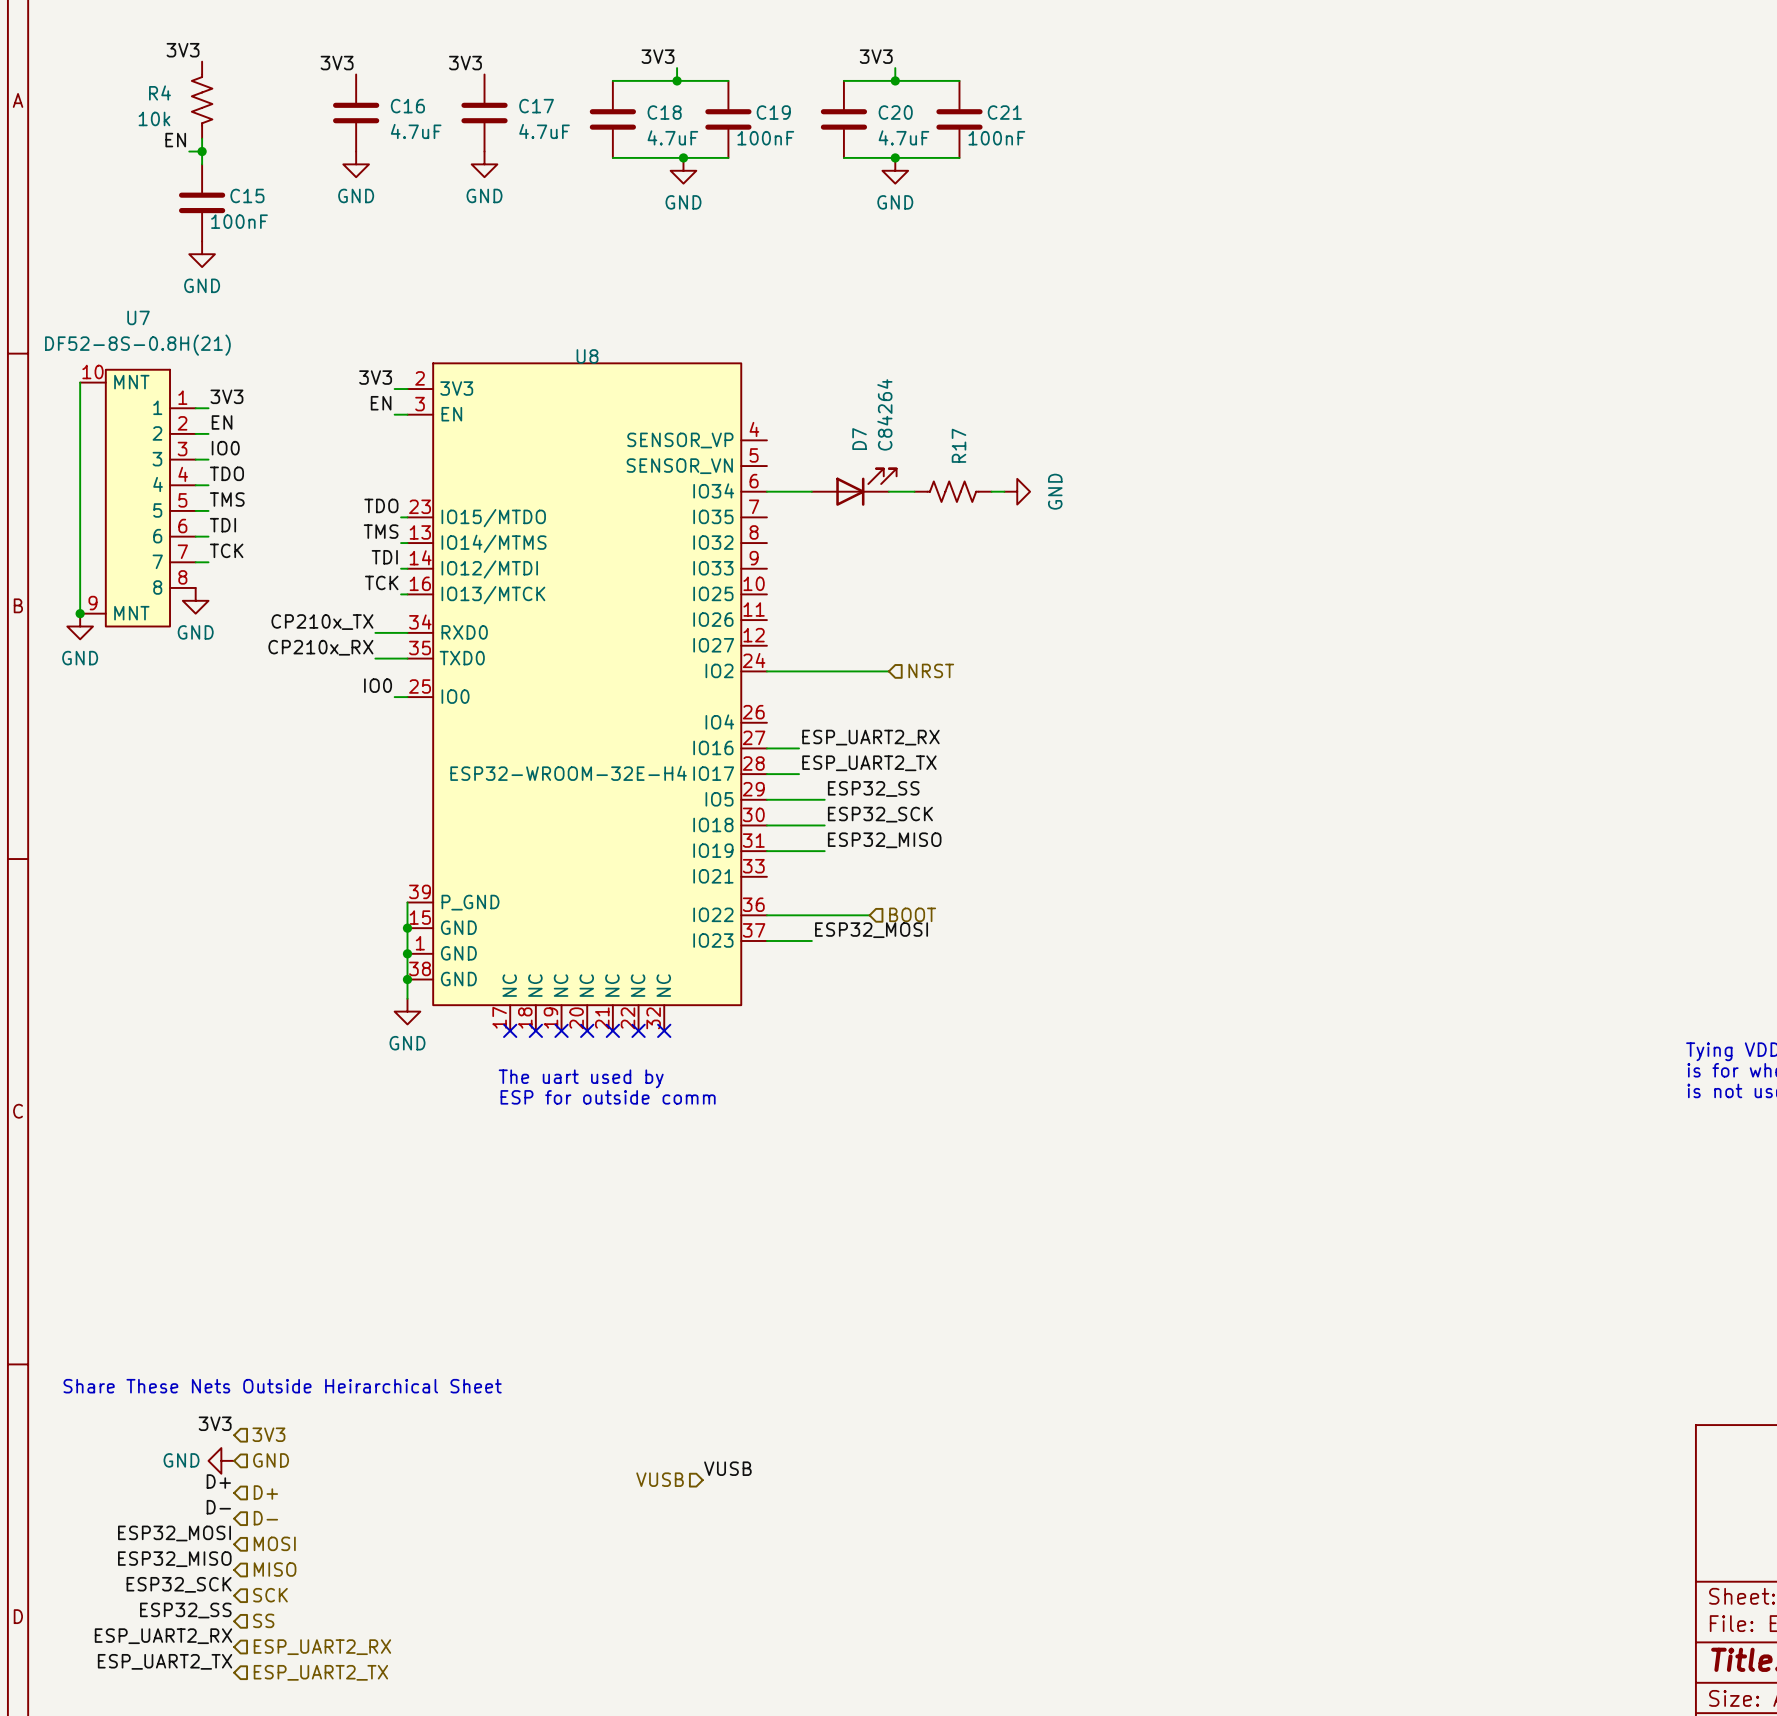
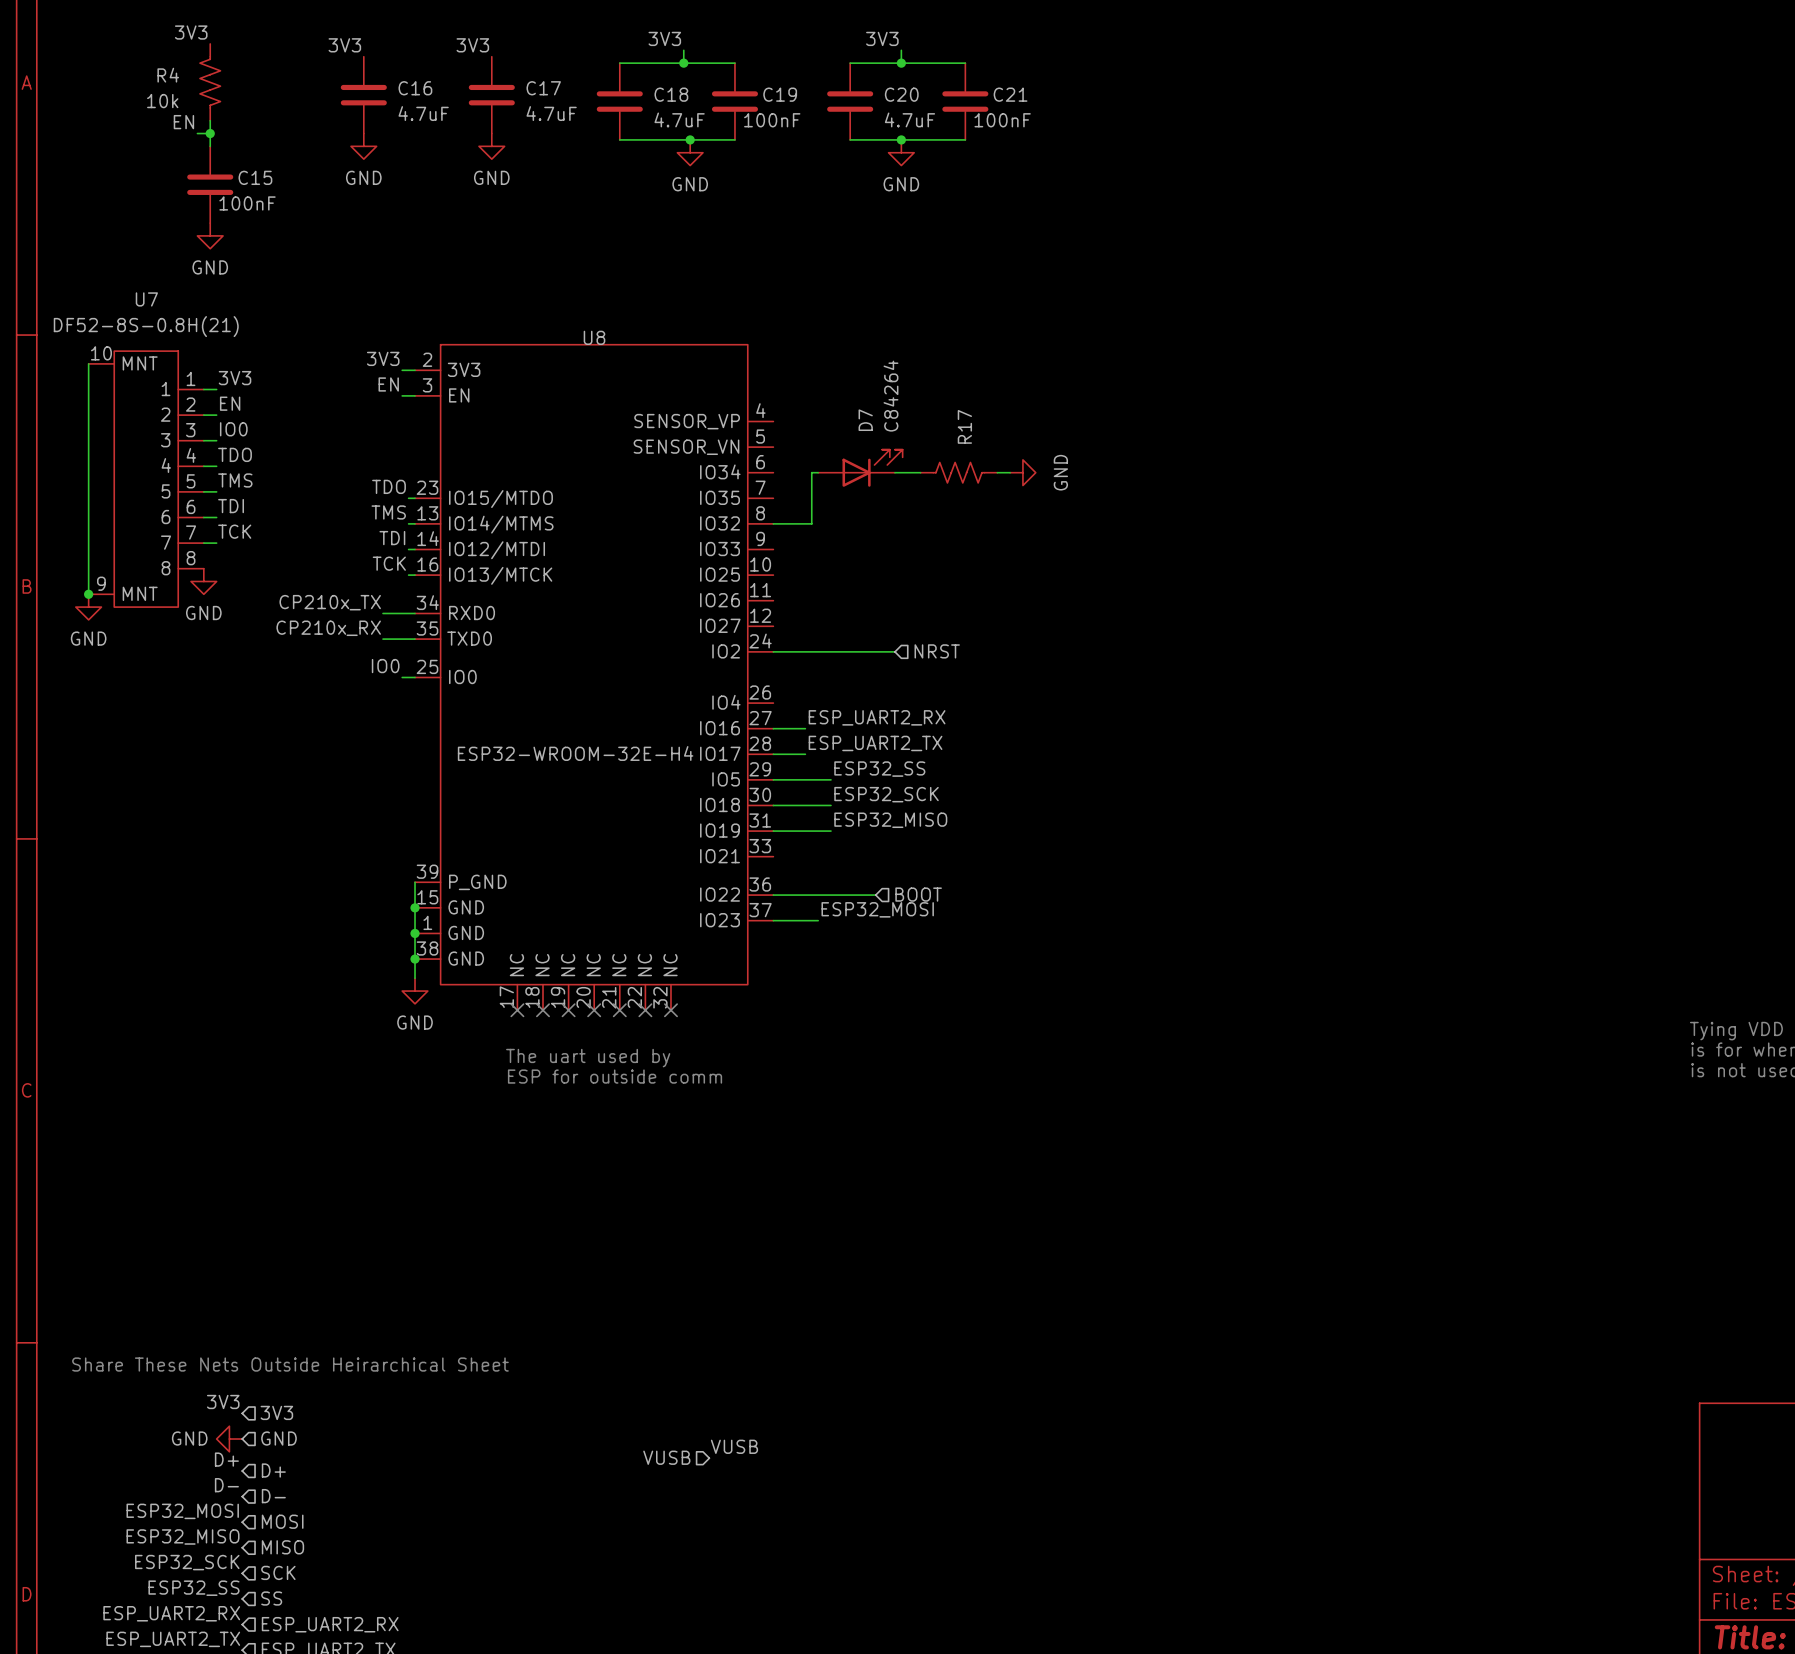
wire: (766, 491) (805, 491) -> (773, 523) (811, 523) (811, 472)

